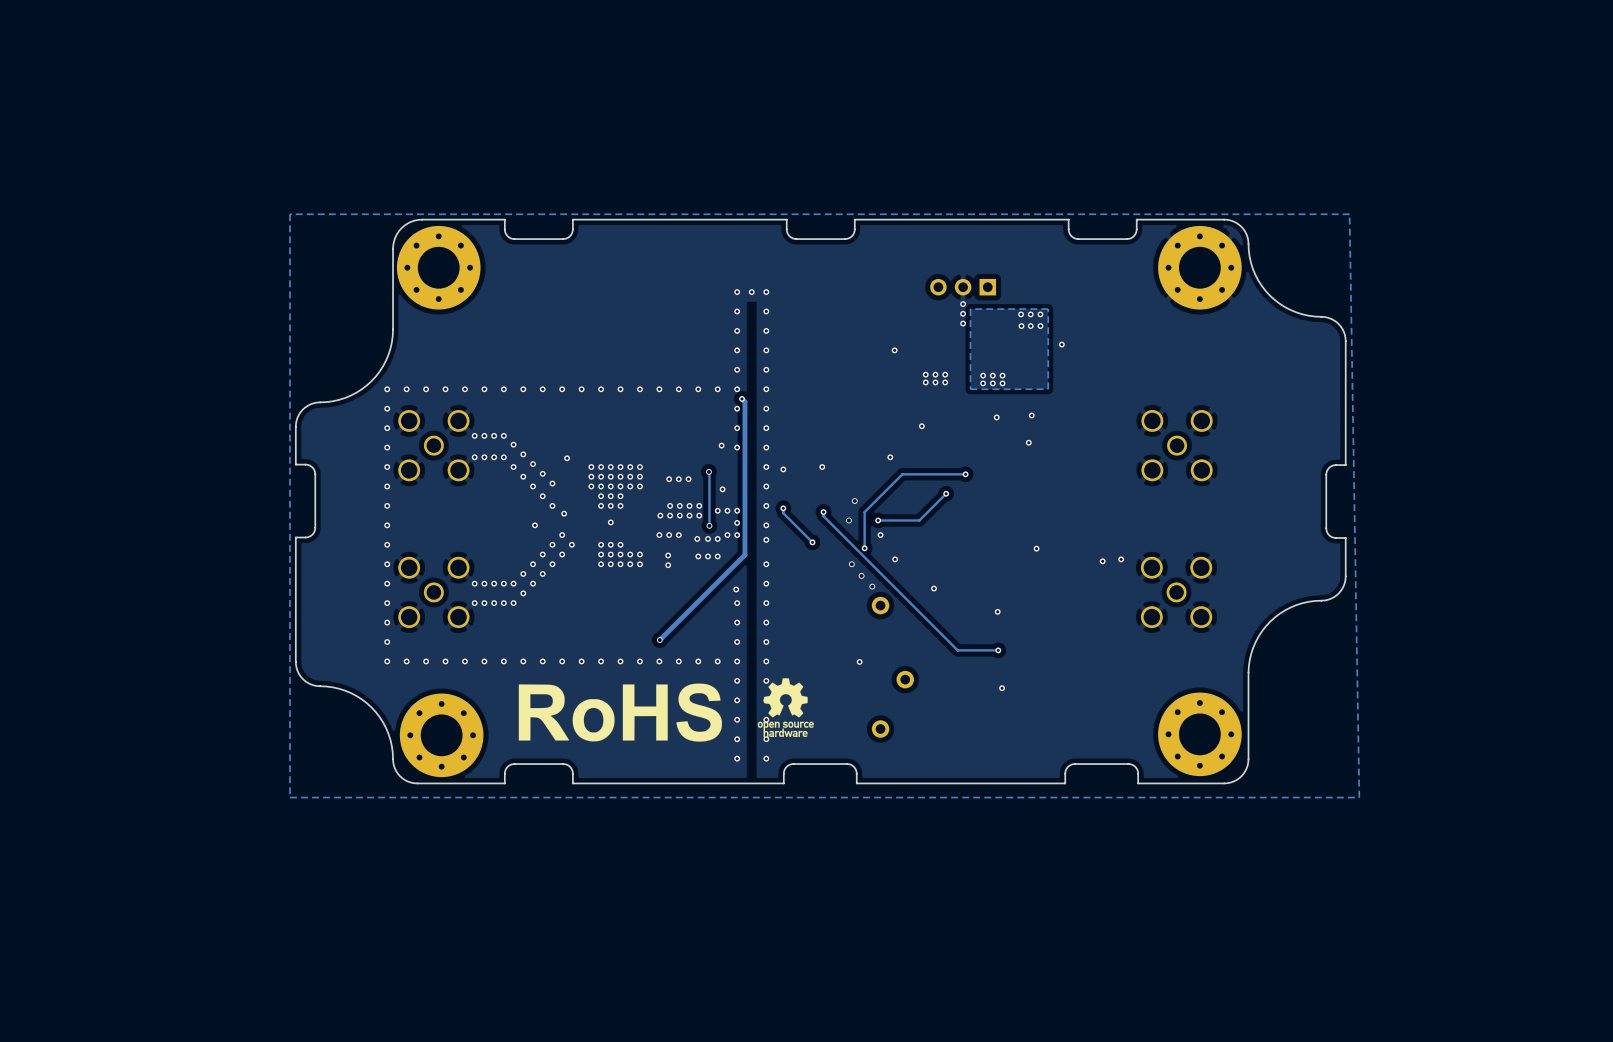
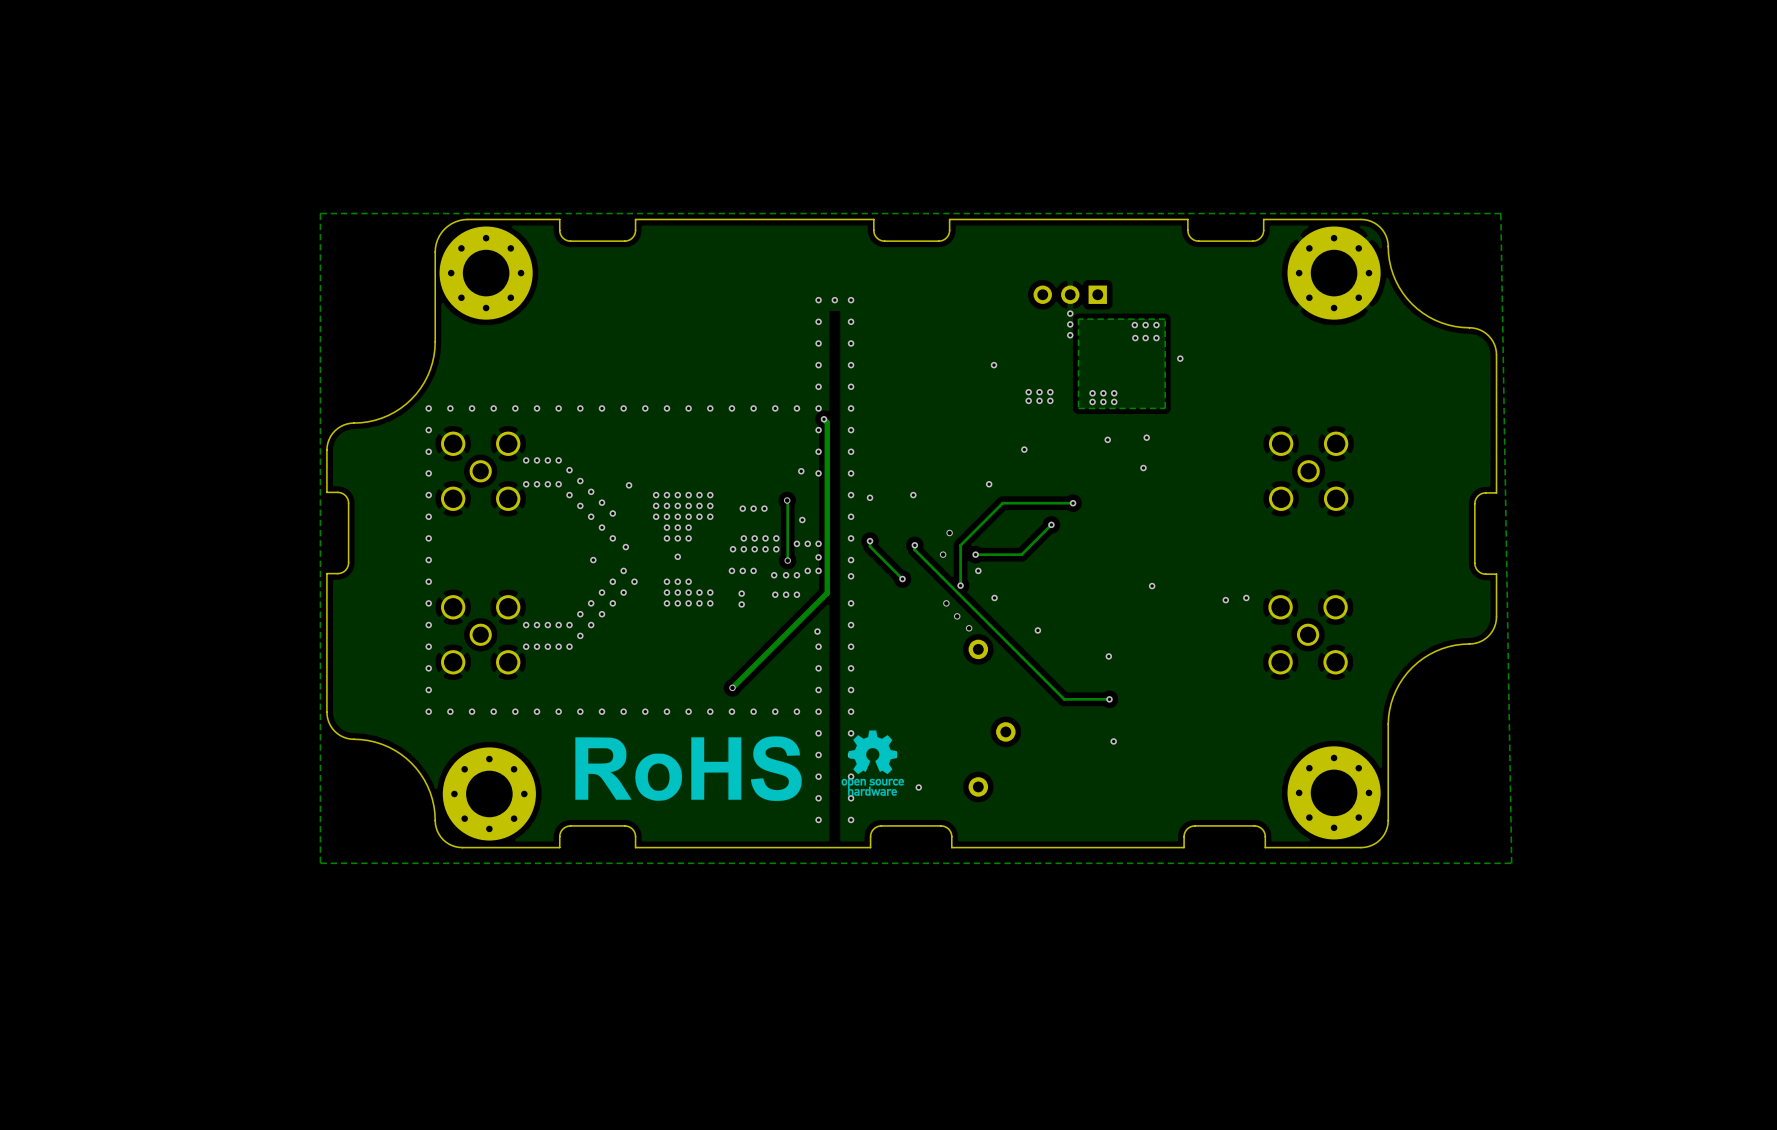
via: (859, 661) -> none
via: none -> (918, 787)

